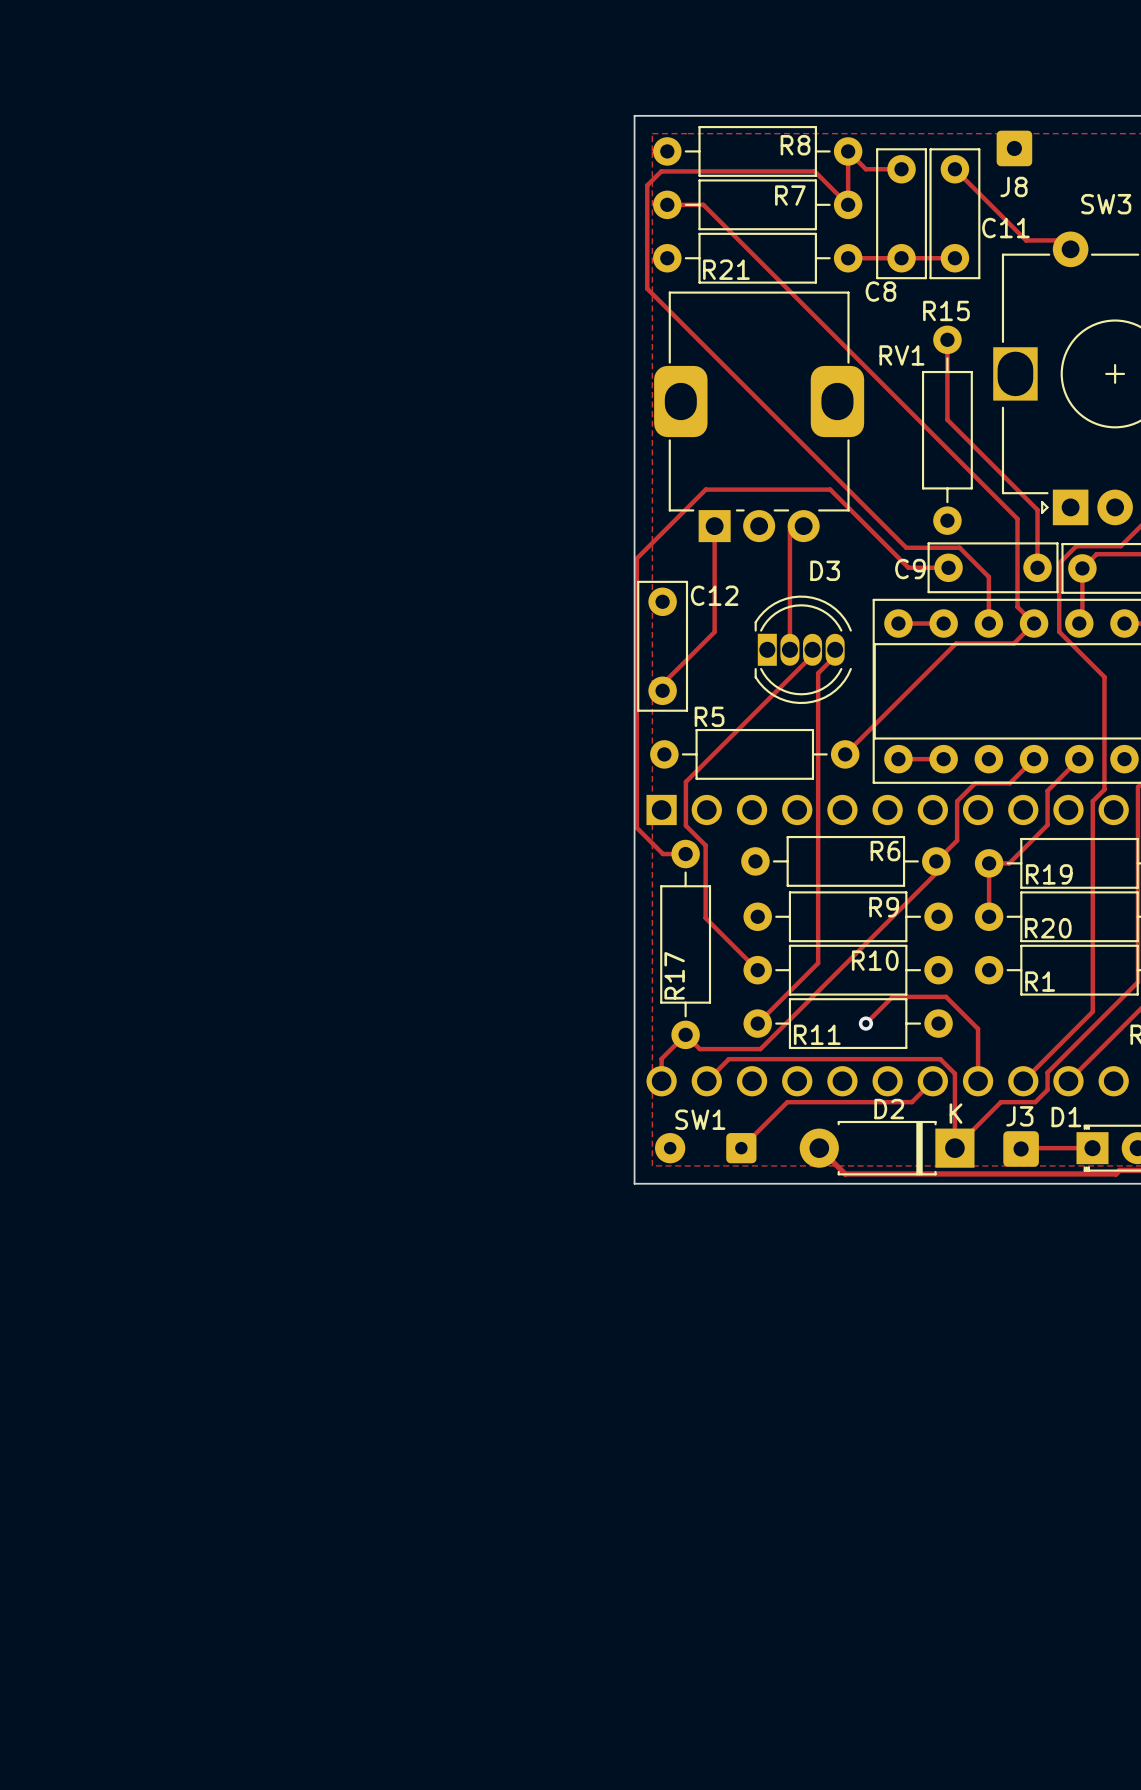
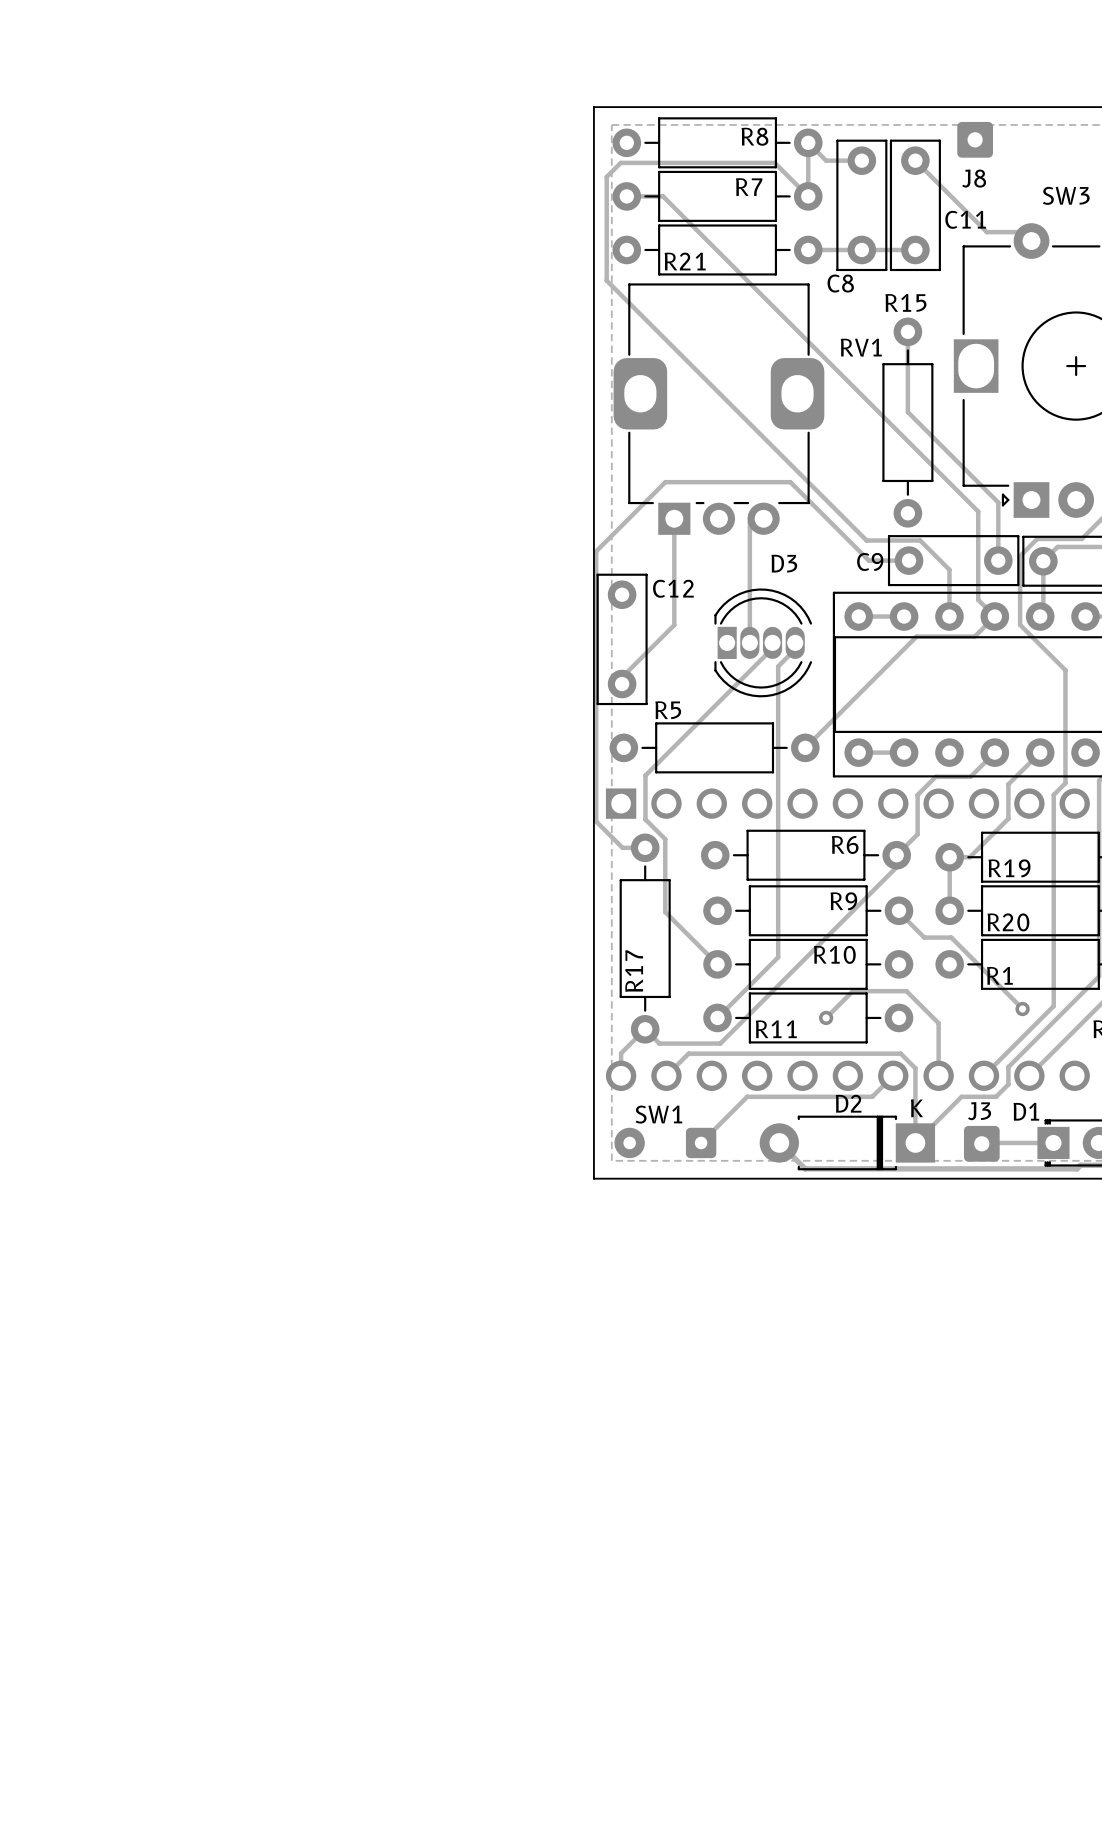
track: none -> (898, 910) (924, 937) (951, 937) (1022, 1008)
via: none -> (1022, 1009)

